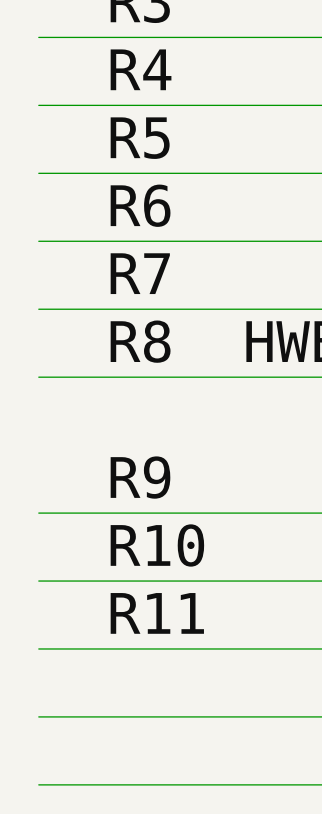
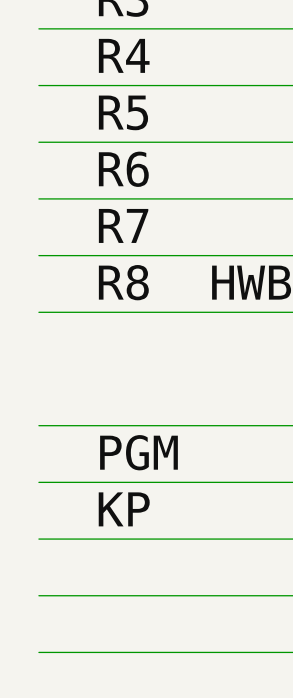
label: R9 (140, 477) -> none
label: R10 (157, 545) -> PGM (138, 452)
label: R11 (157, 613) -> KP (124, 509)

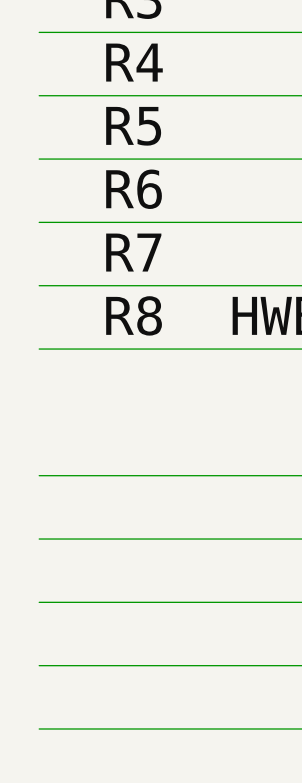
label: PGM (138, 452) -> none
label: KP (124, 509) -> none

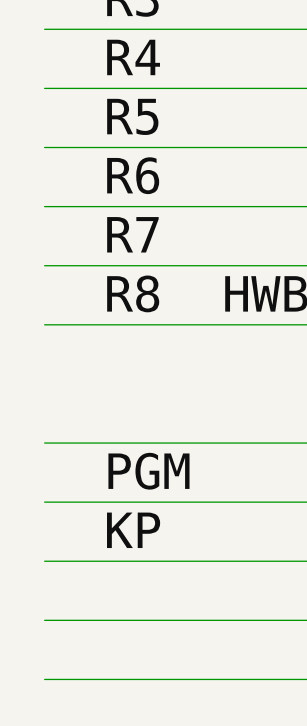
label: none -> PGM (148, 471)
label: none -> KP (133, 530)

